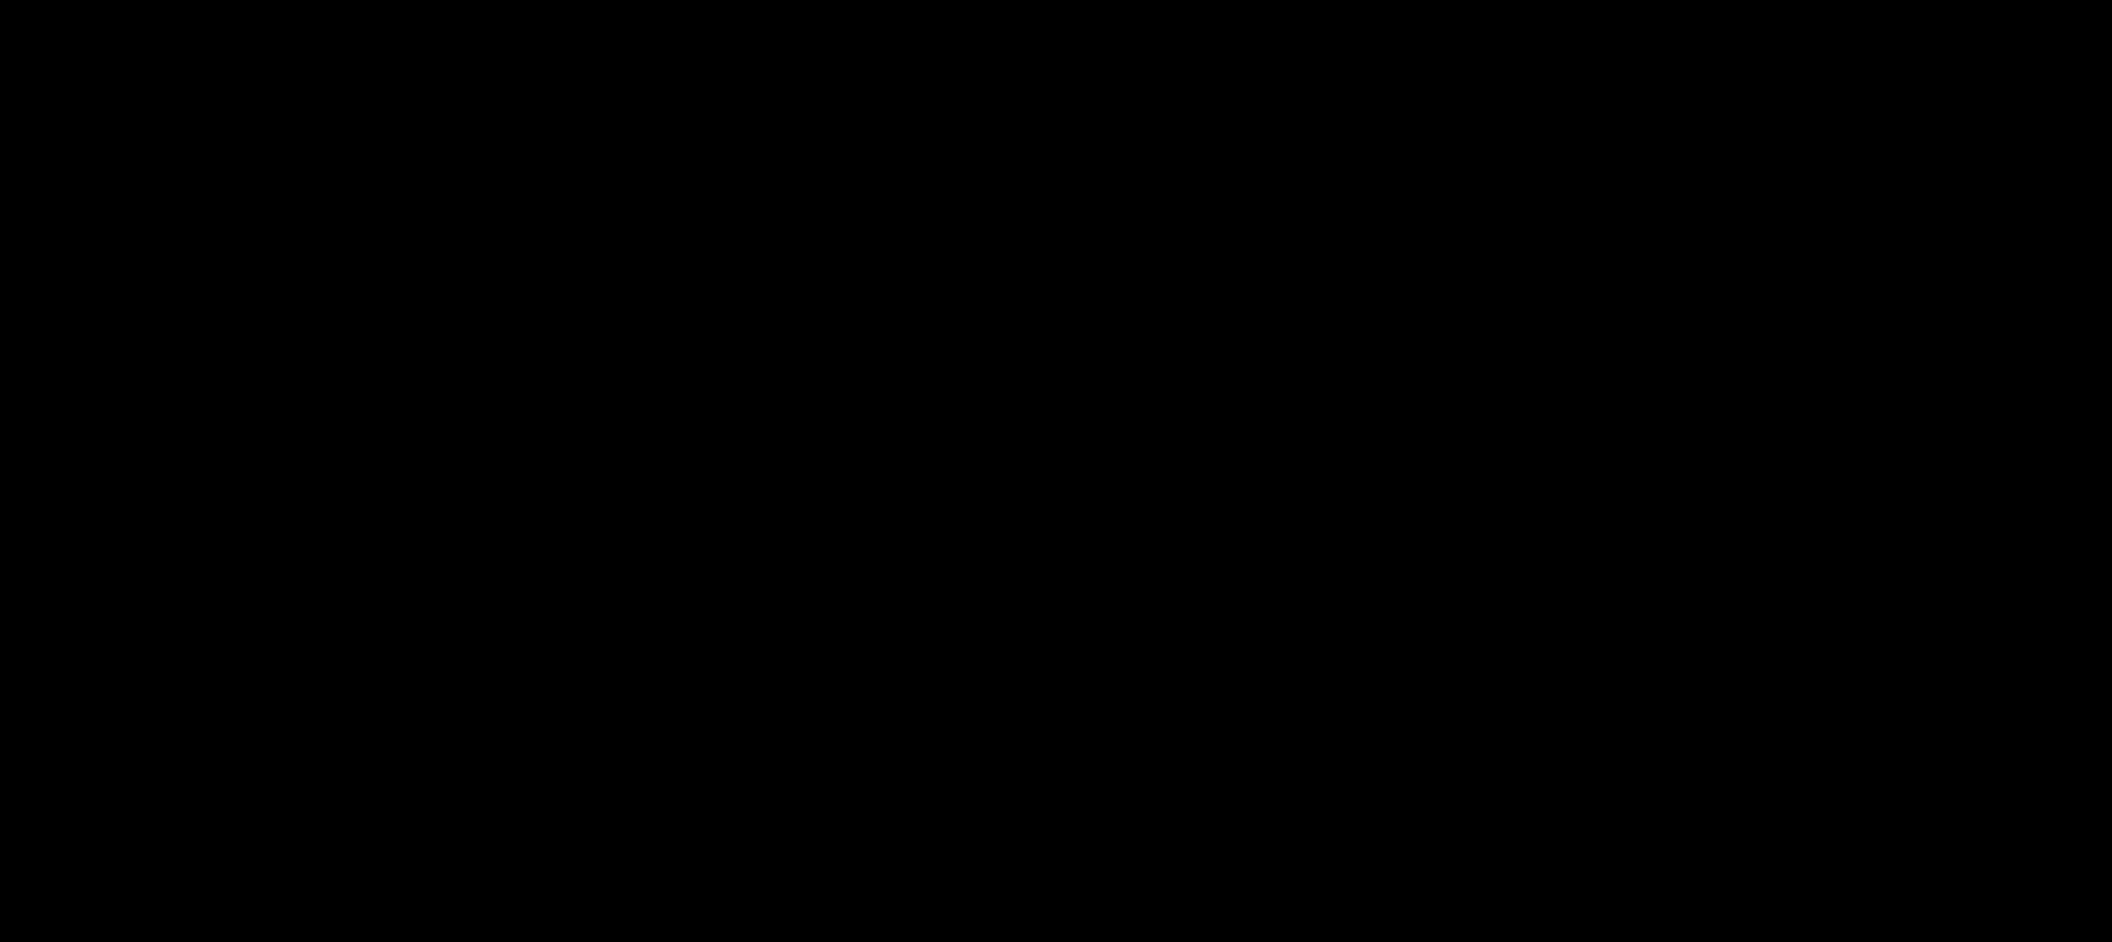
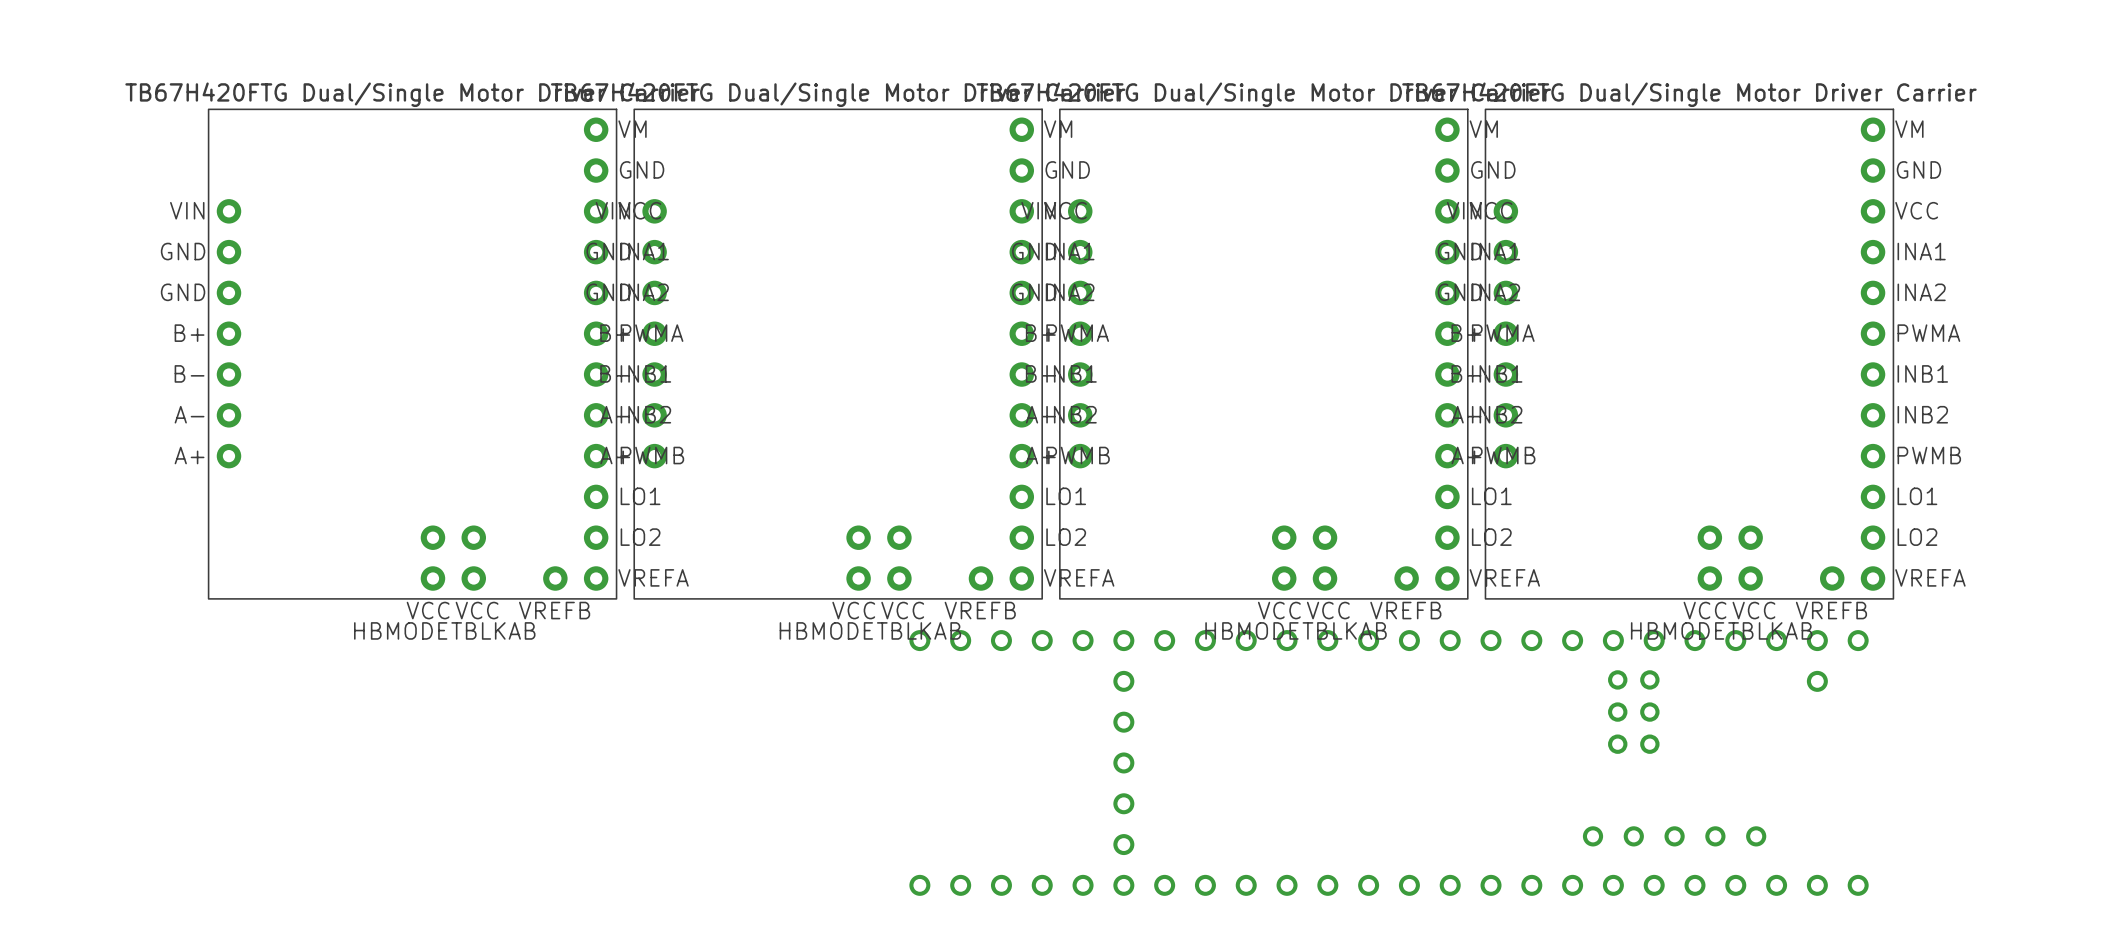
part: none -> (412, 354)
part: none -> (838, 354)
part: none -> (1263, 354)
part: none -> (1689, 354)
part: none -> (1389, 762)

